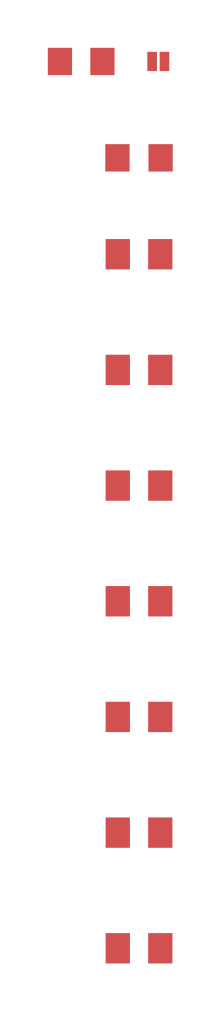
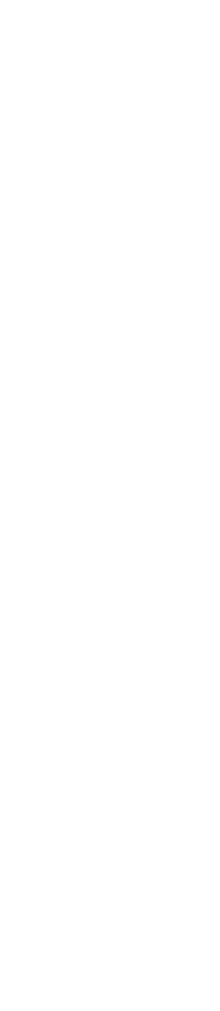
part: (81, 61) -> none
part: (158, 61) -> none
part: (139, 157) -> none
part: (139, 254) -> none
part: (139, 369) -> none
part: (139, 485) -> none
part: (139, 601) -> none
part: (139, 716) -> none
part: (139, 832) -> none
part: (139, 948) -> none

